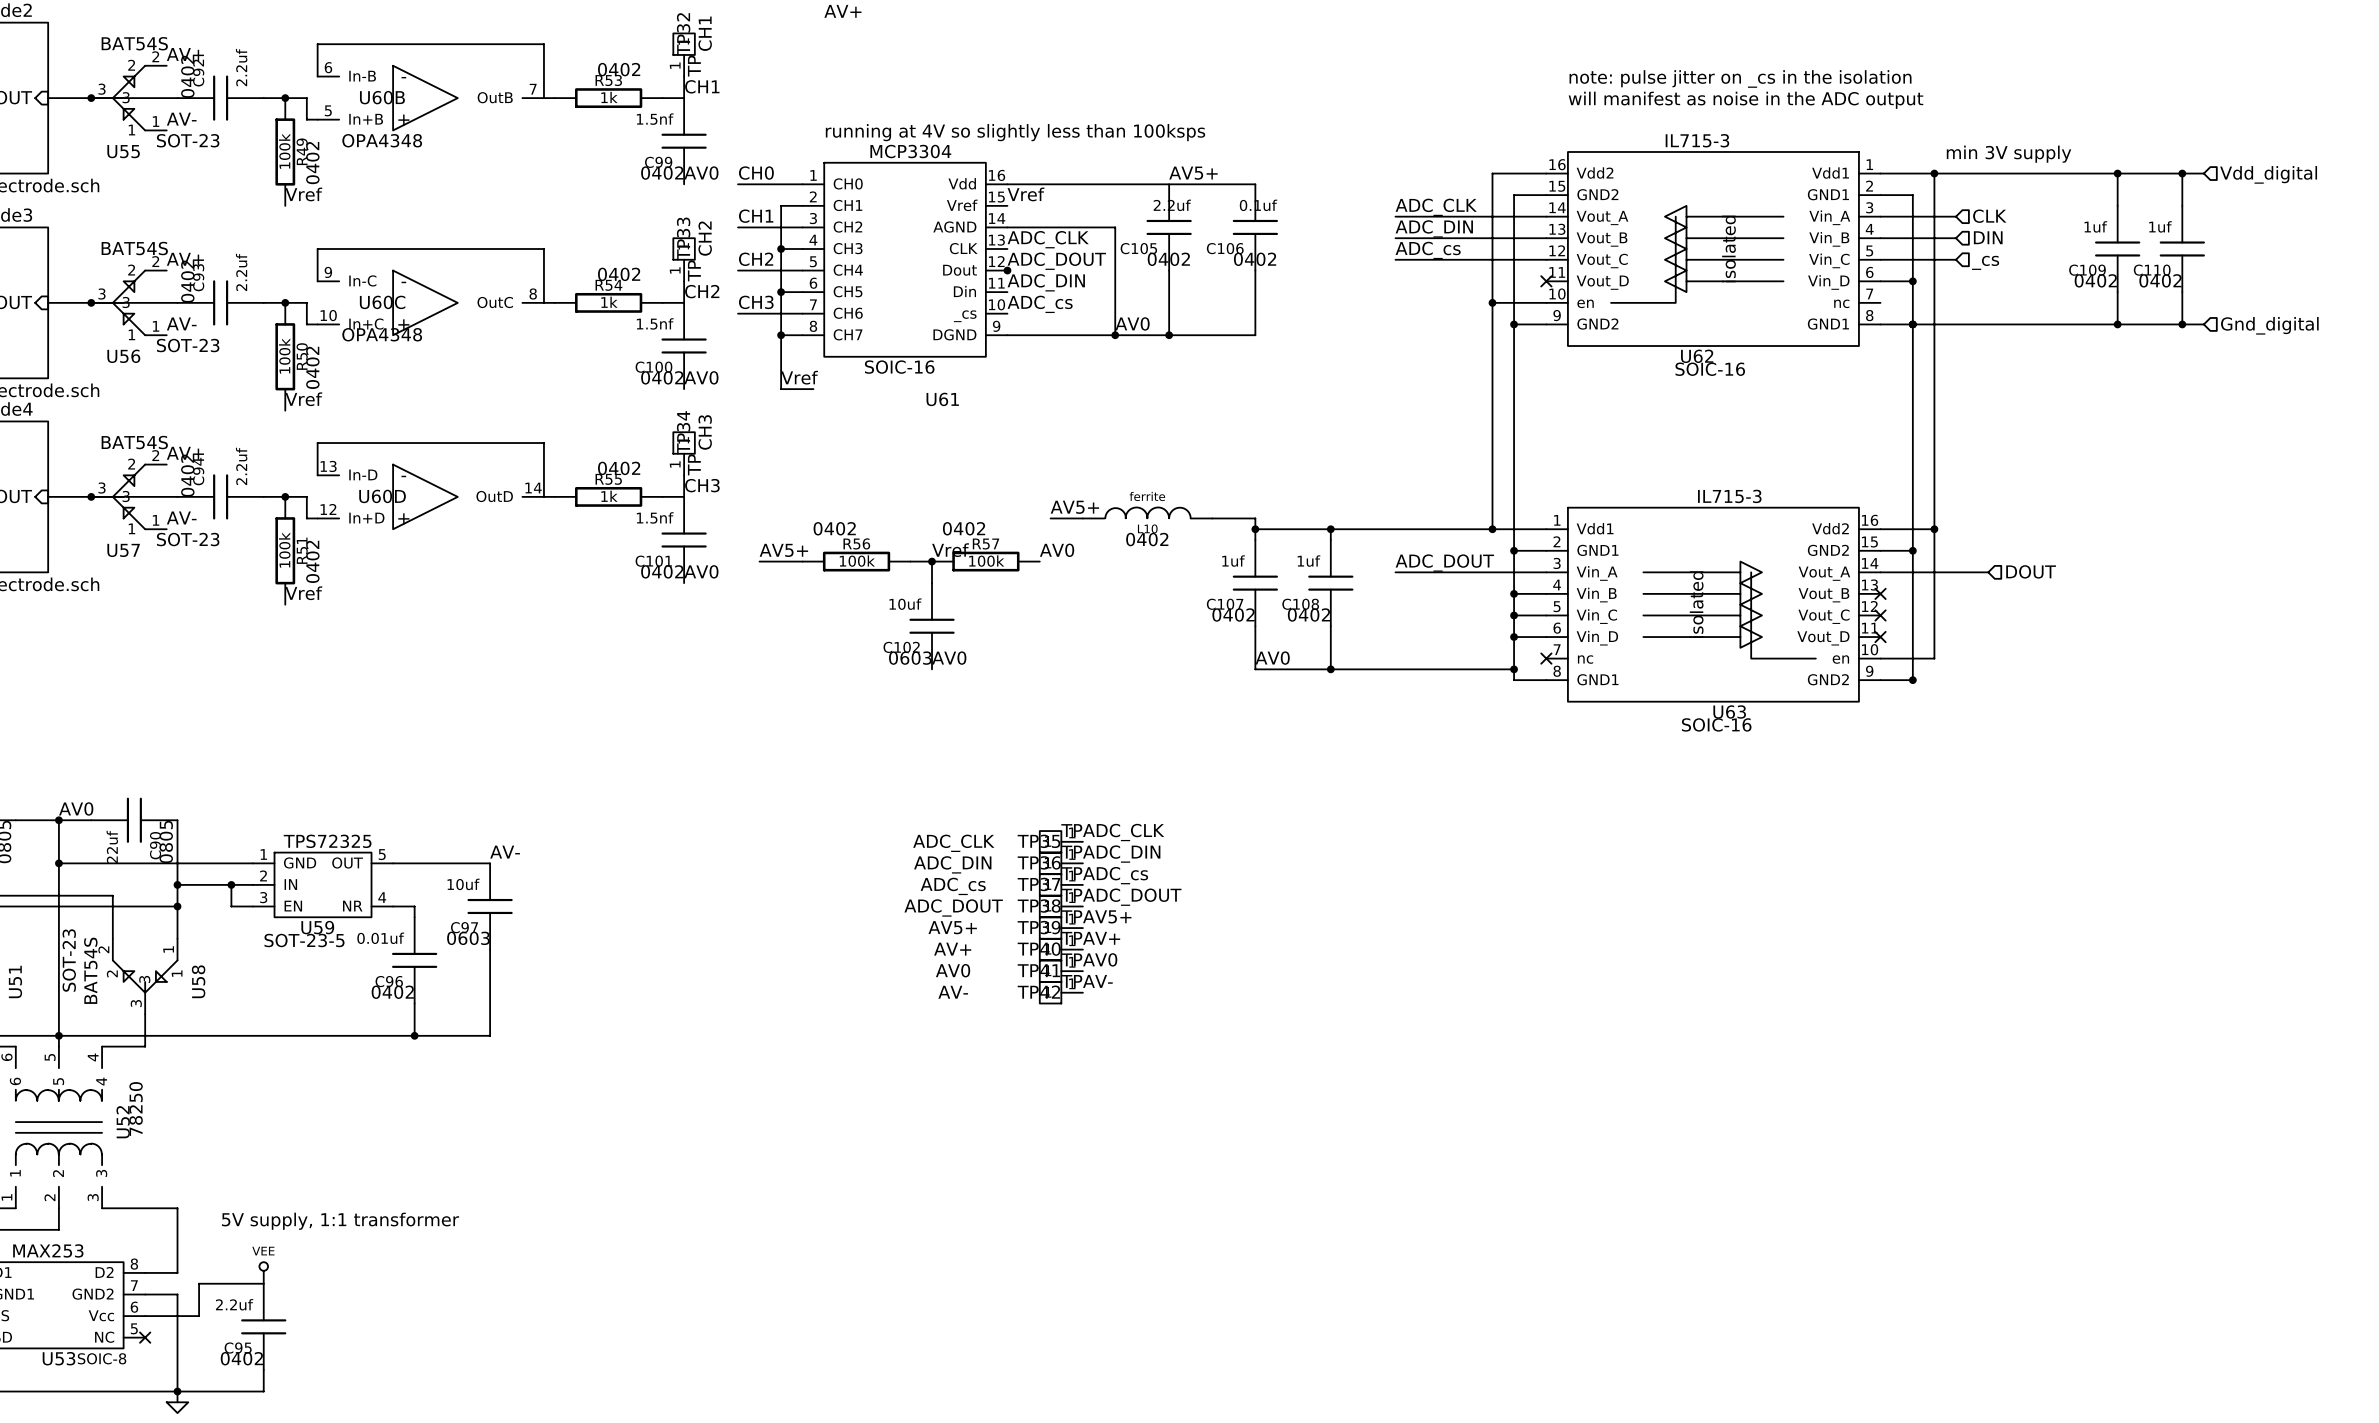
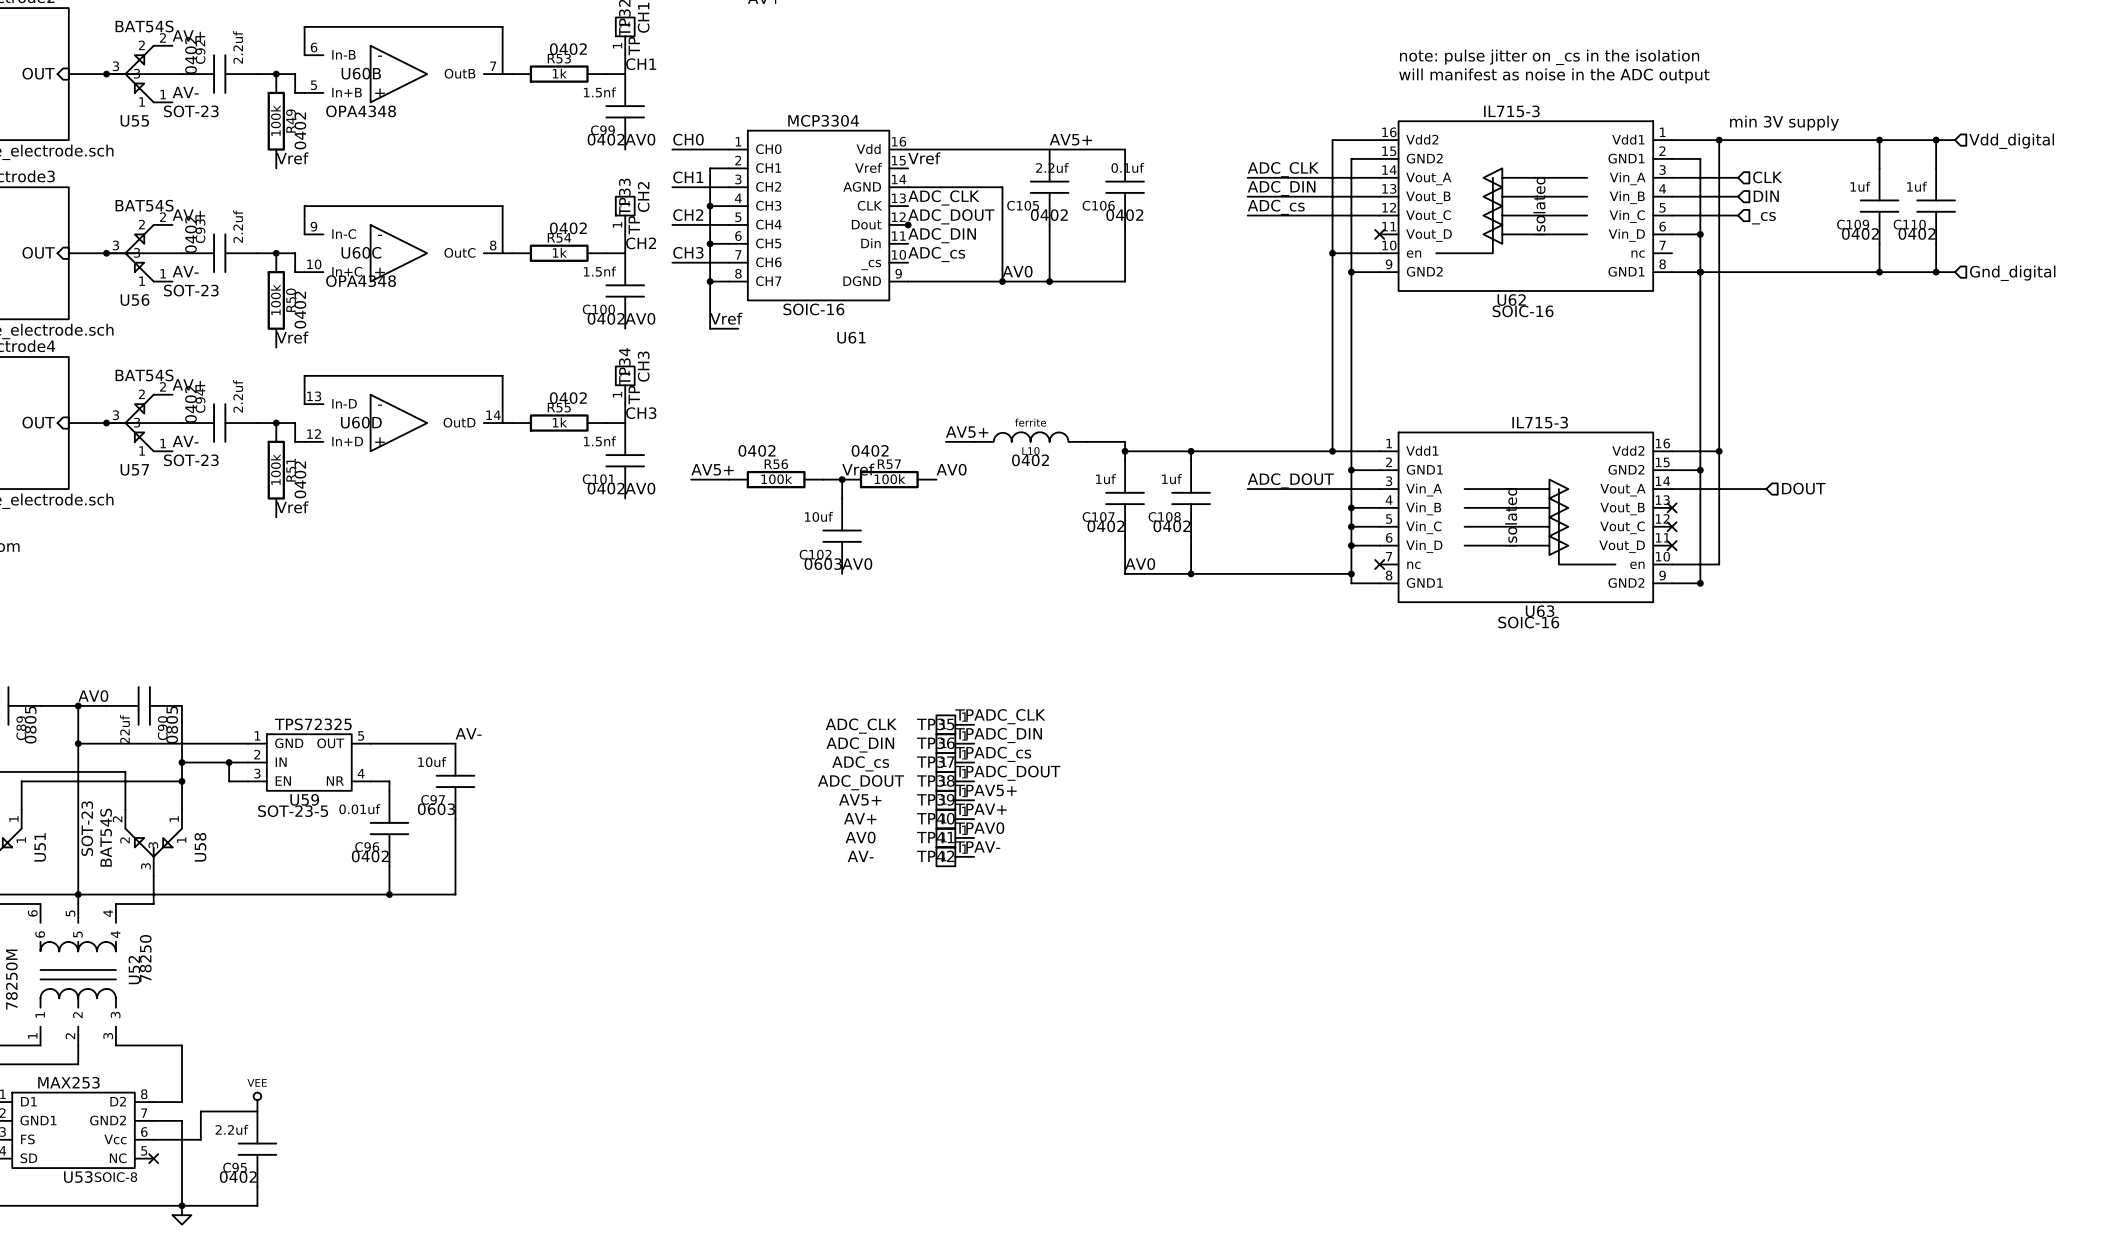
text: running at 4V so slightly less than 100ksps (1015, 132) -> none
text: 5V supply, 1:1 transformer (340, 1221) -> none

